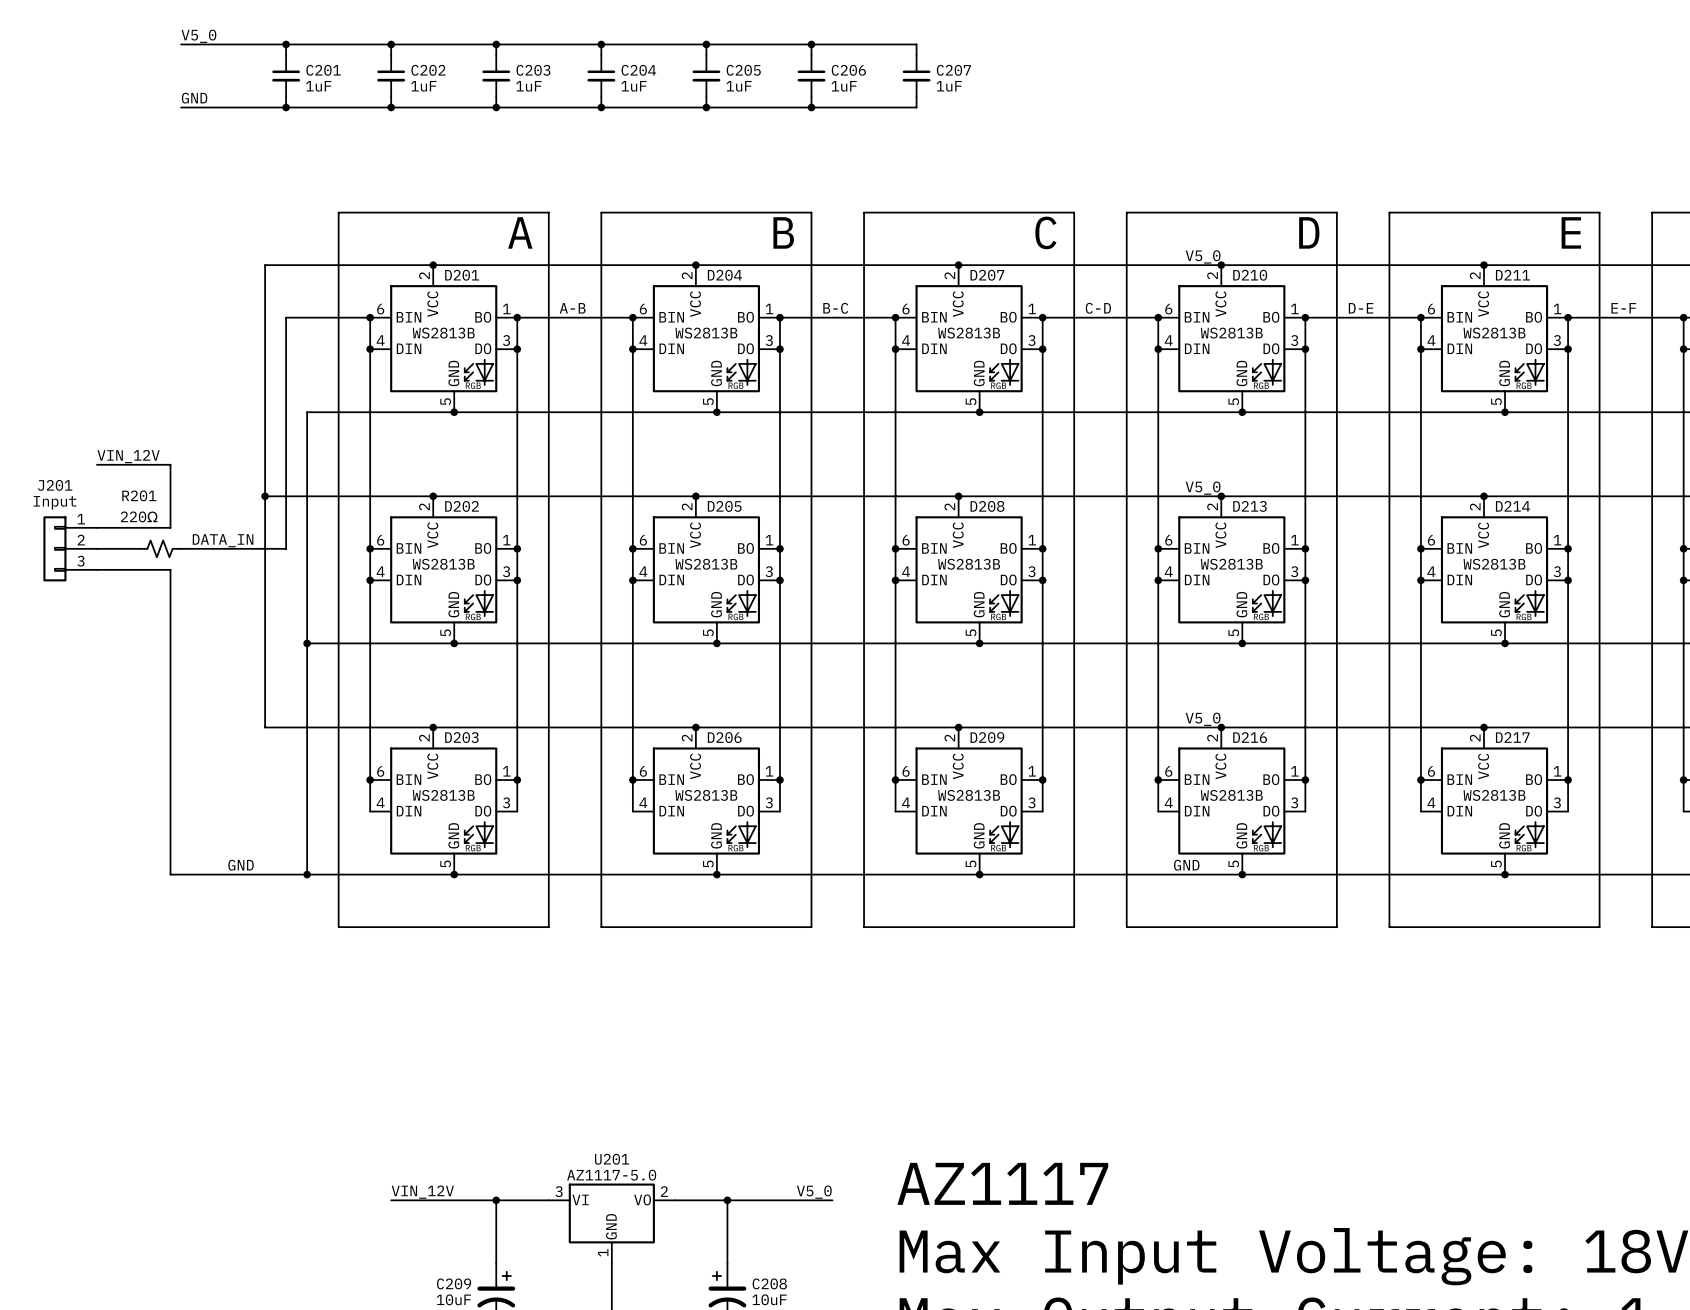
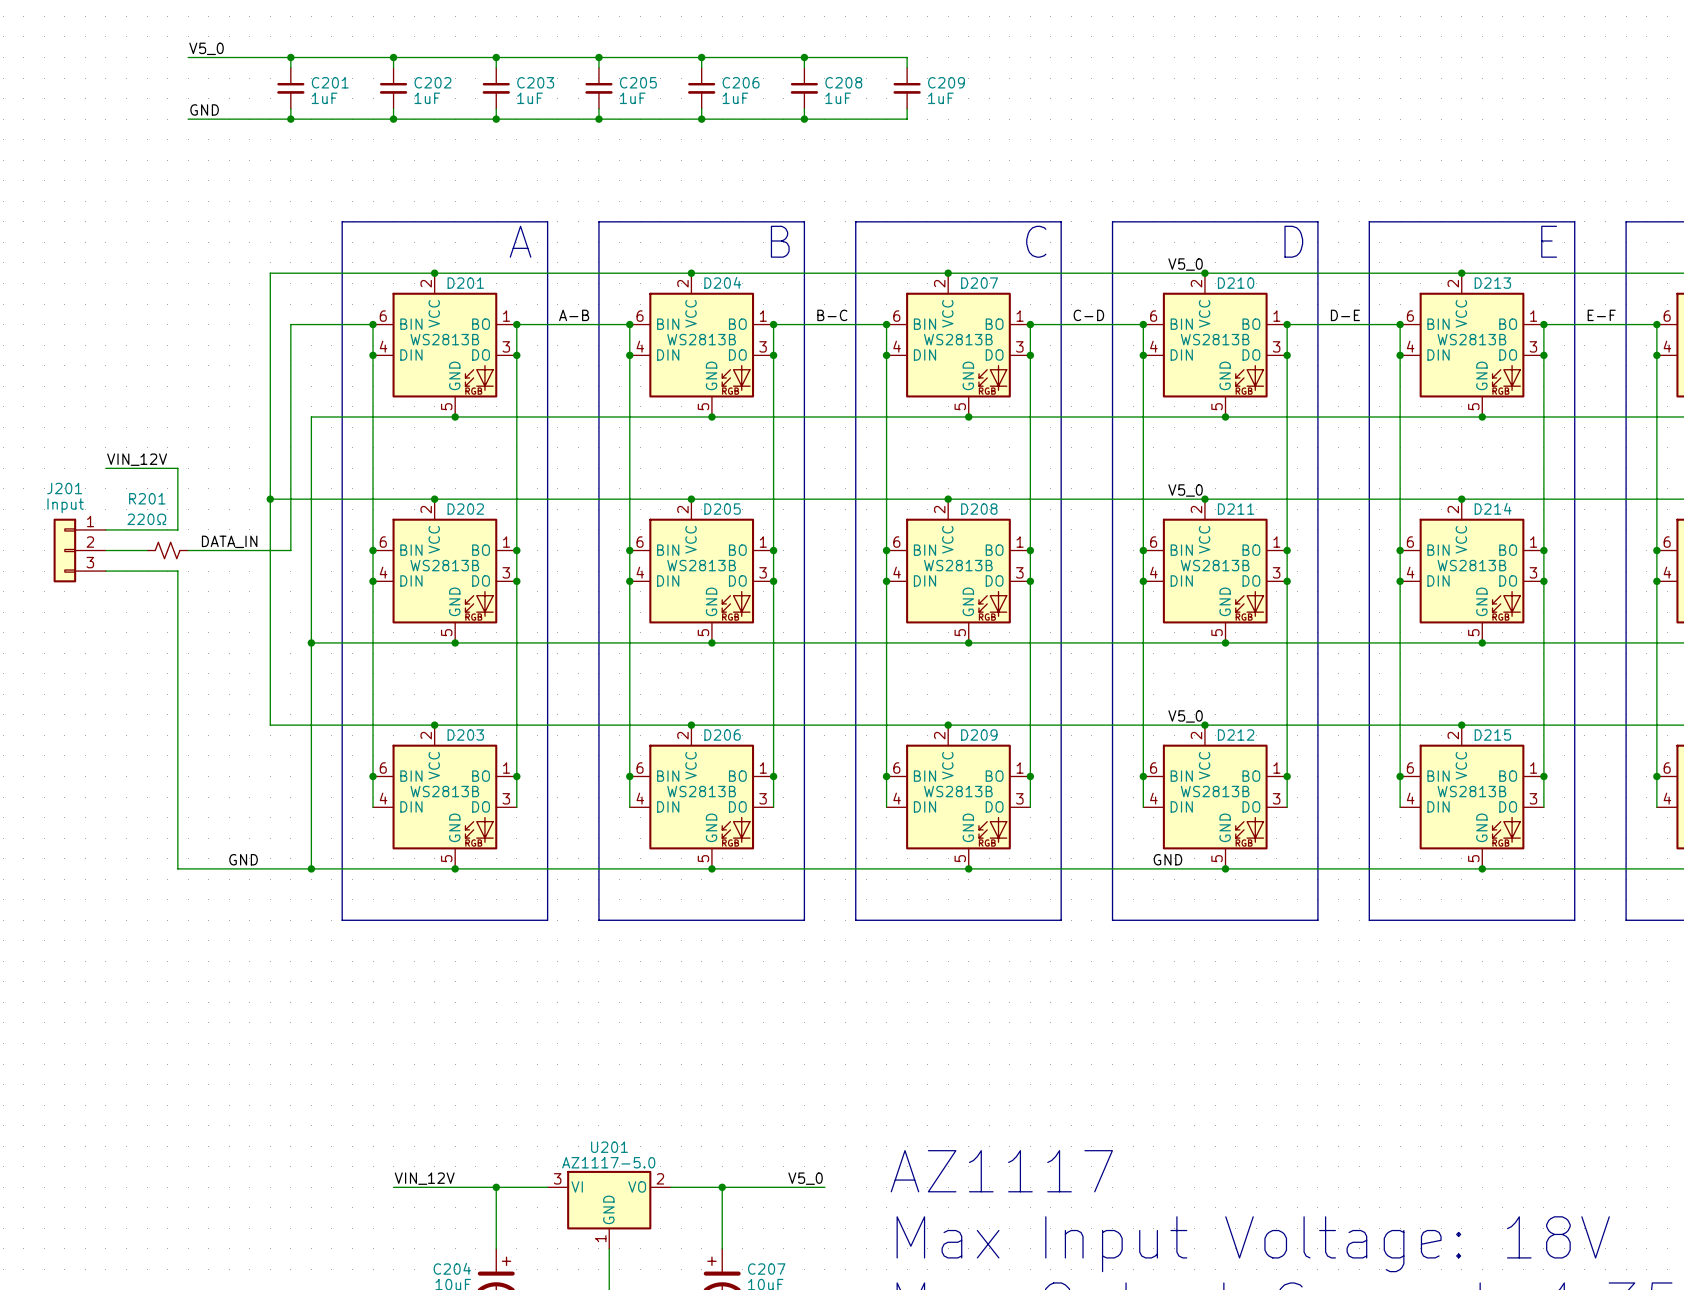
C204 name: C204 (638, 70) -> C205 (638, 82)
C205 name: C205 (743, 70) -> C206 (741, 82)
C206 name: C206 (848, 70) -> C208 (843, 82)
C207 name: C207 (953, 70) -> C209 (946, 82)
D211 name: D211 (1512, 275) -> D213 (1492, 283)
D213 name: D213 (1249, 506) -> D211 (1236, 509)
D216 name: D216 (1250, 737) -> D212 (1236, 735)
D217 name: D217 (1512, 737) -> D215 (1492, 735)
C209 name: C209 (454, 1283) -> C204 (452, 1268)
C208 name: C208 (769, 1283) -> C207 (766, 1269)

